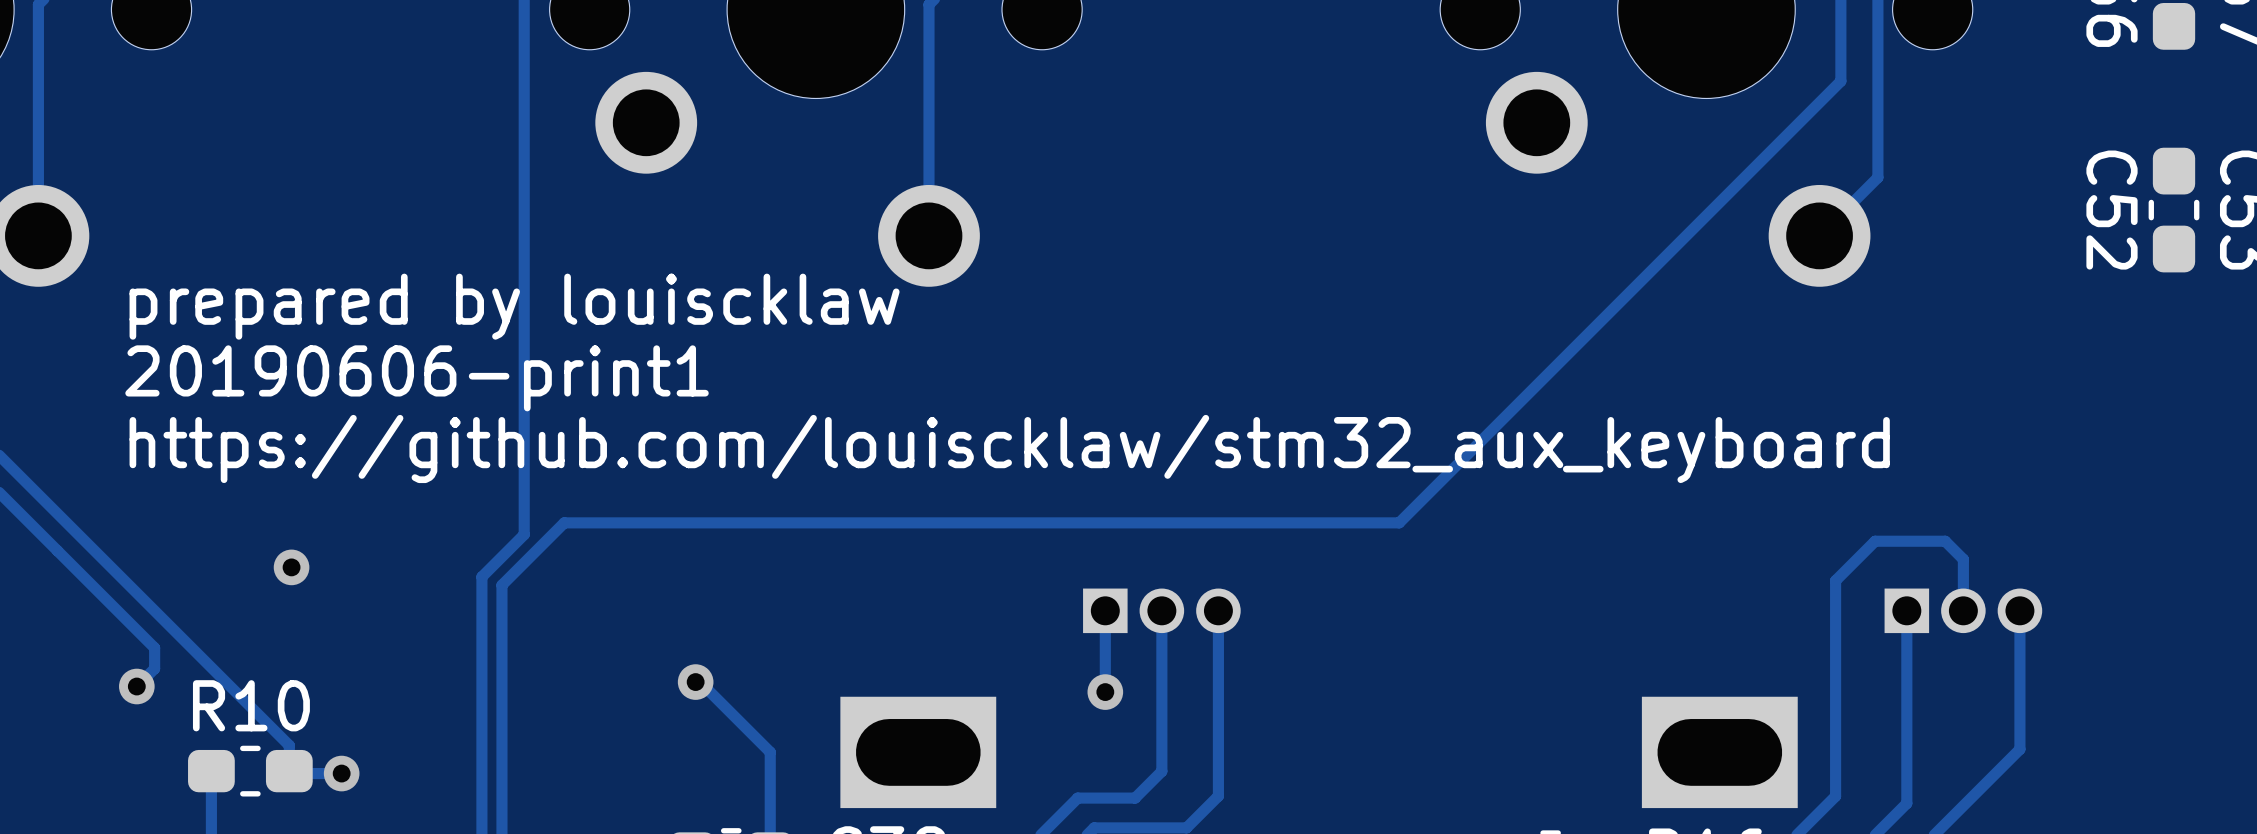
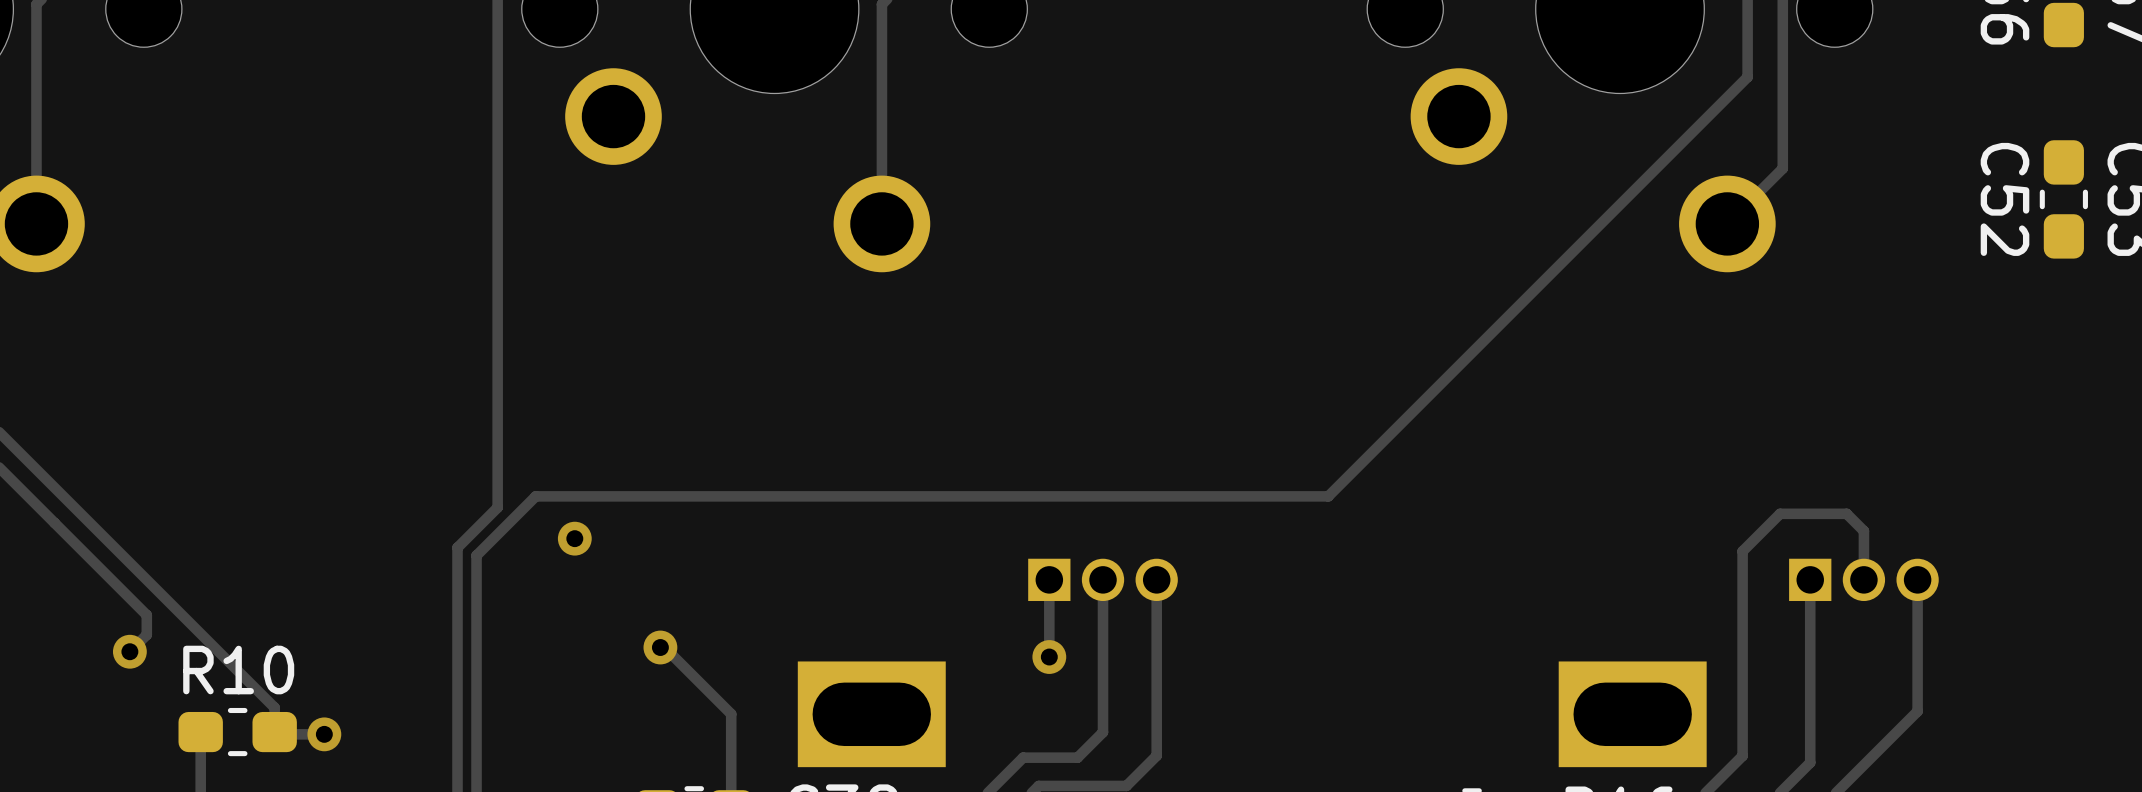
text: prepared by louiscklaw (514, 306) -> none
text: 20190606-print1 (417, 378) -> none
text: https://github.com/louiscklaw/stm32_aux_keyboard (1009, 448) -> none
via: (291, 567) -> none
via: none -> (574, 538)

